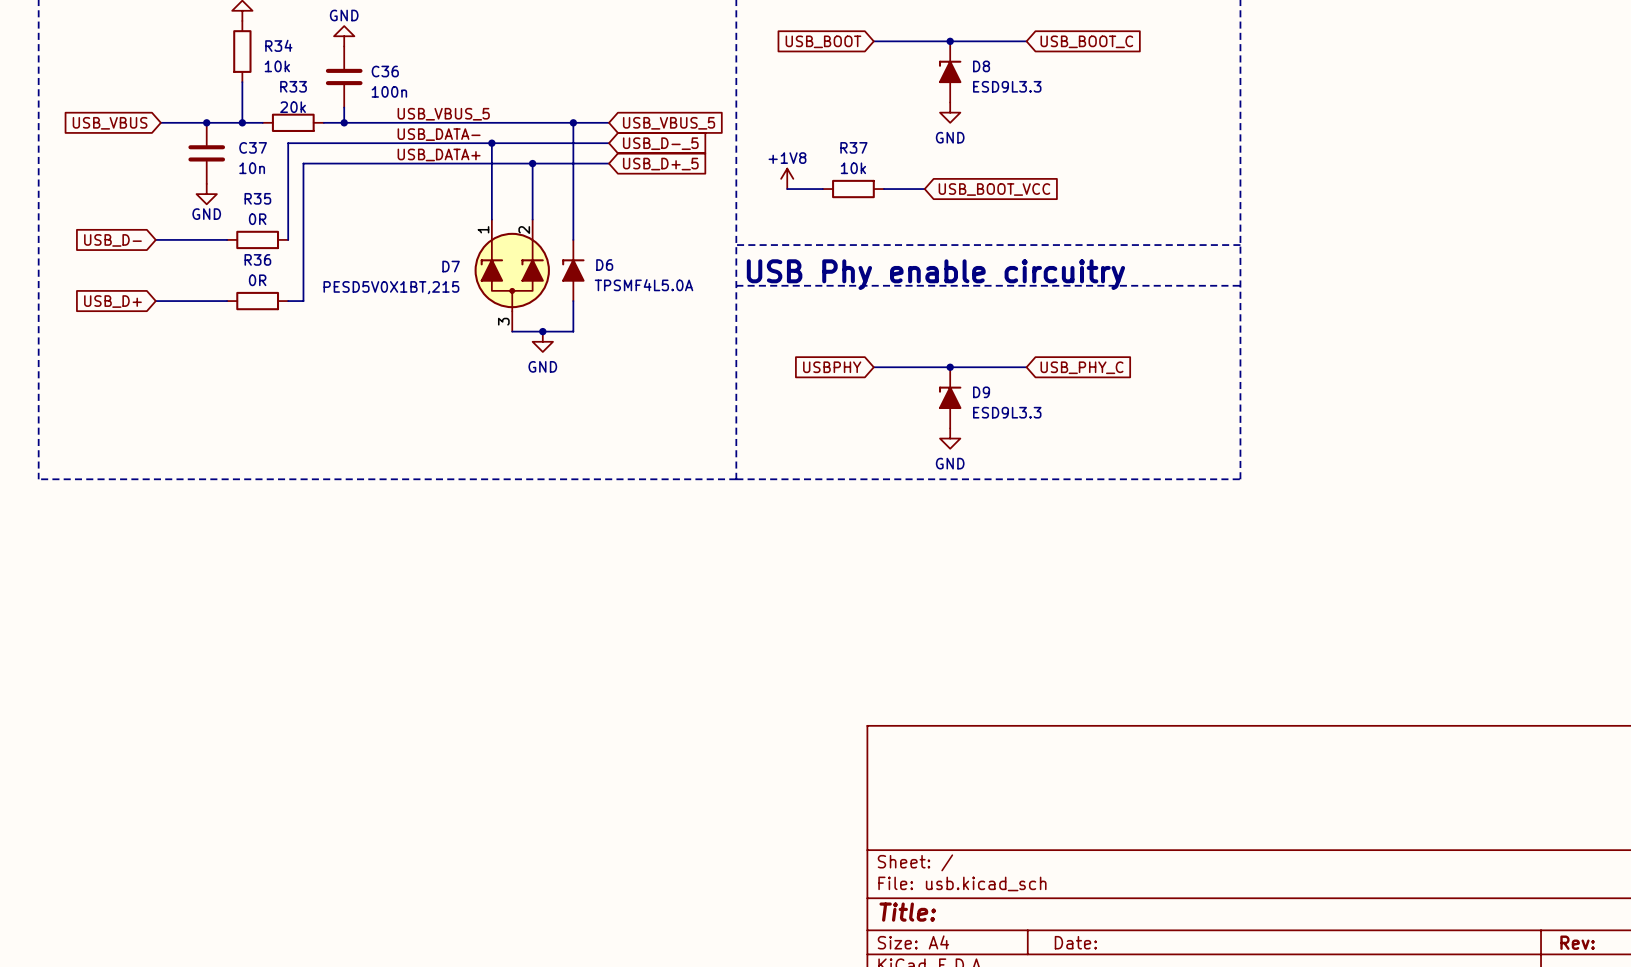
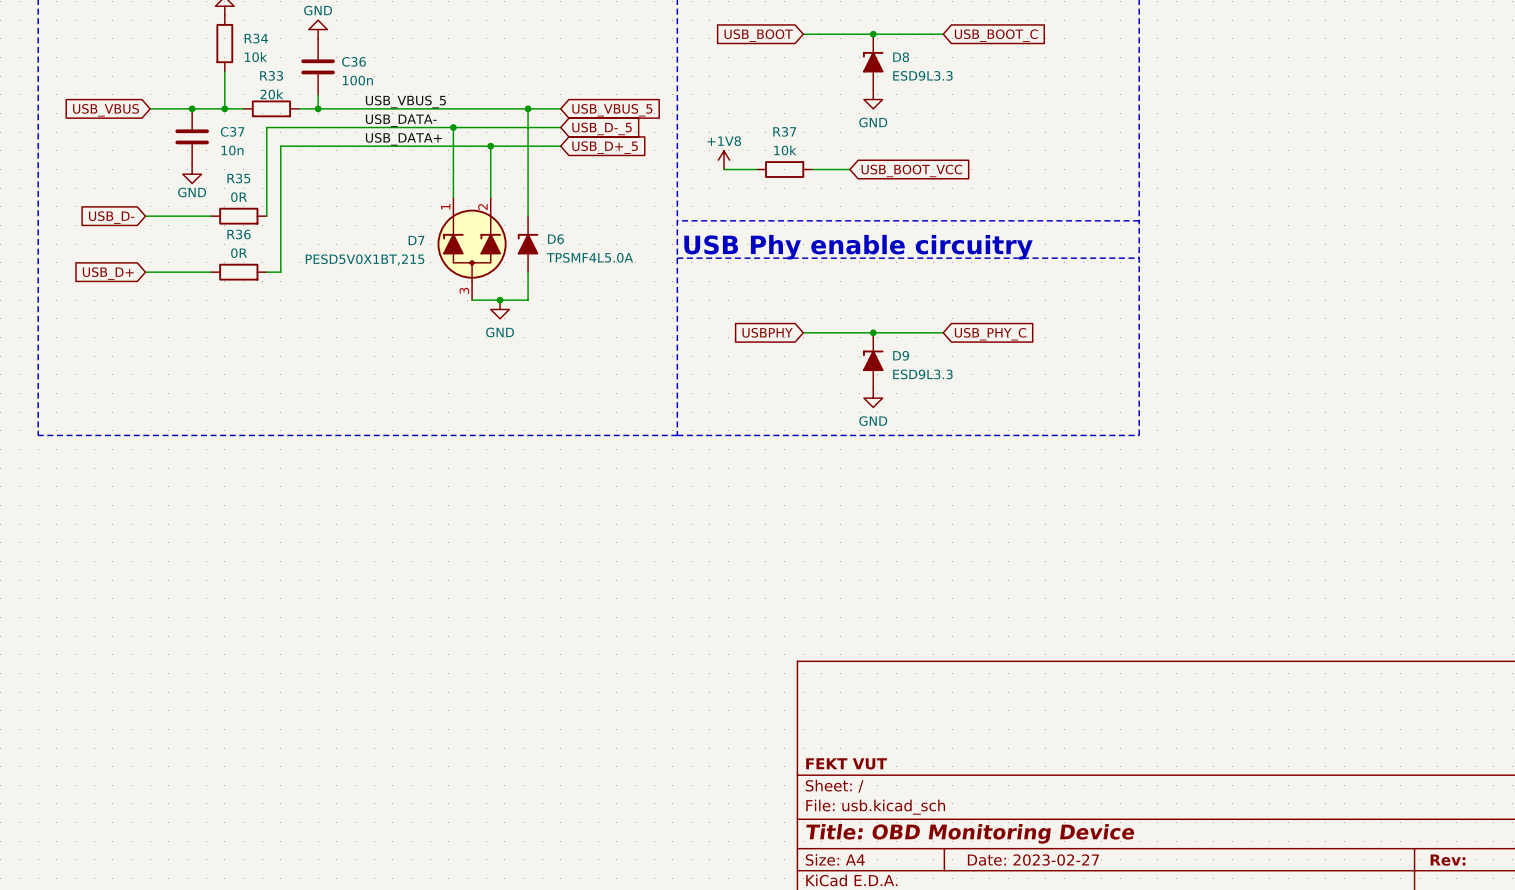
title block: none -> FEKT VUT (846, 763)
title block: Title: (907, 912) -> Title: OBD Monitoring Device (970, 833)
title block: Date: (1075, 942) -> Date: 2023-02-27 (1033, 860)

